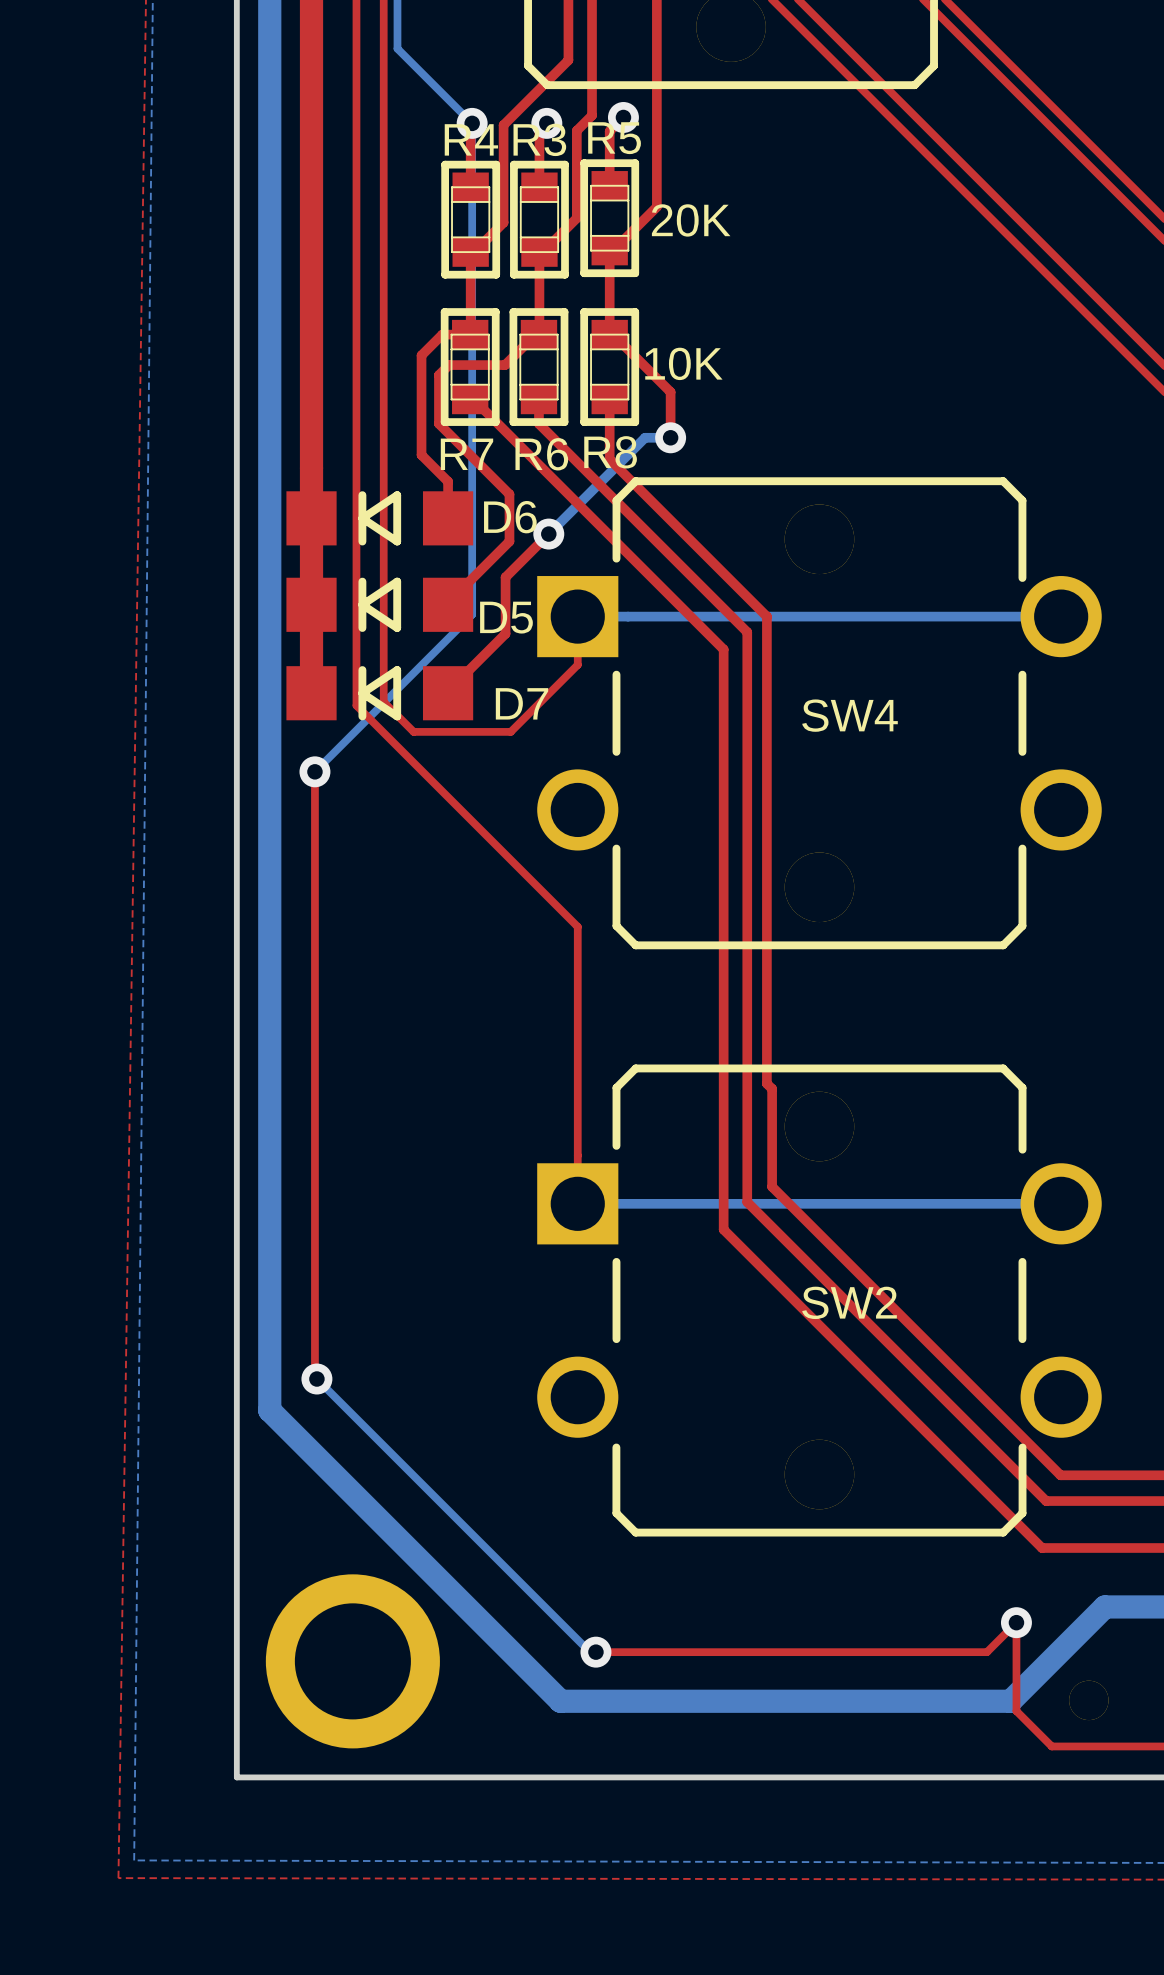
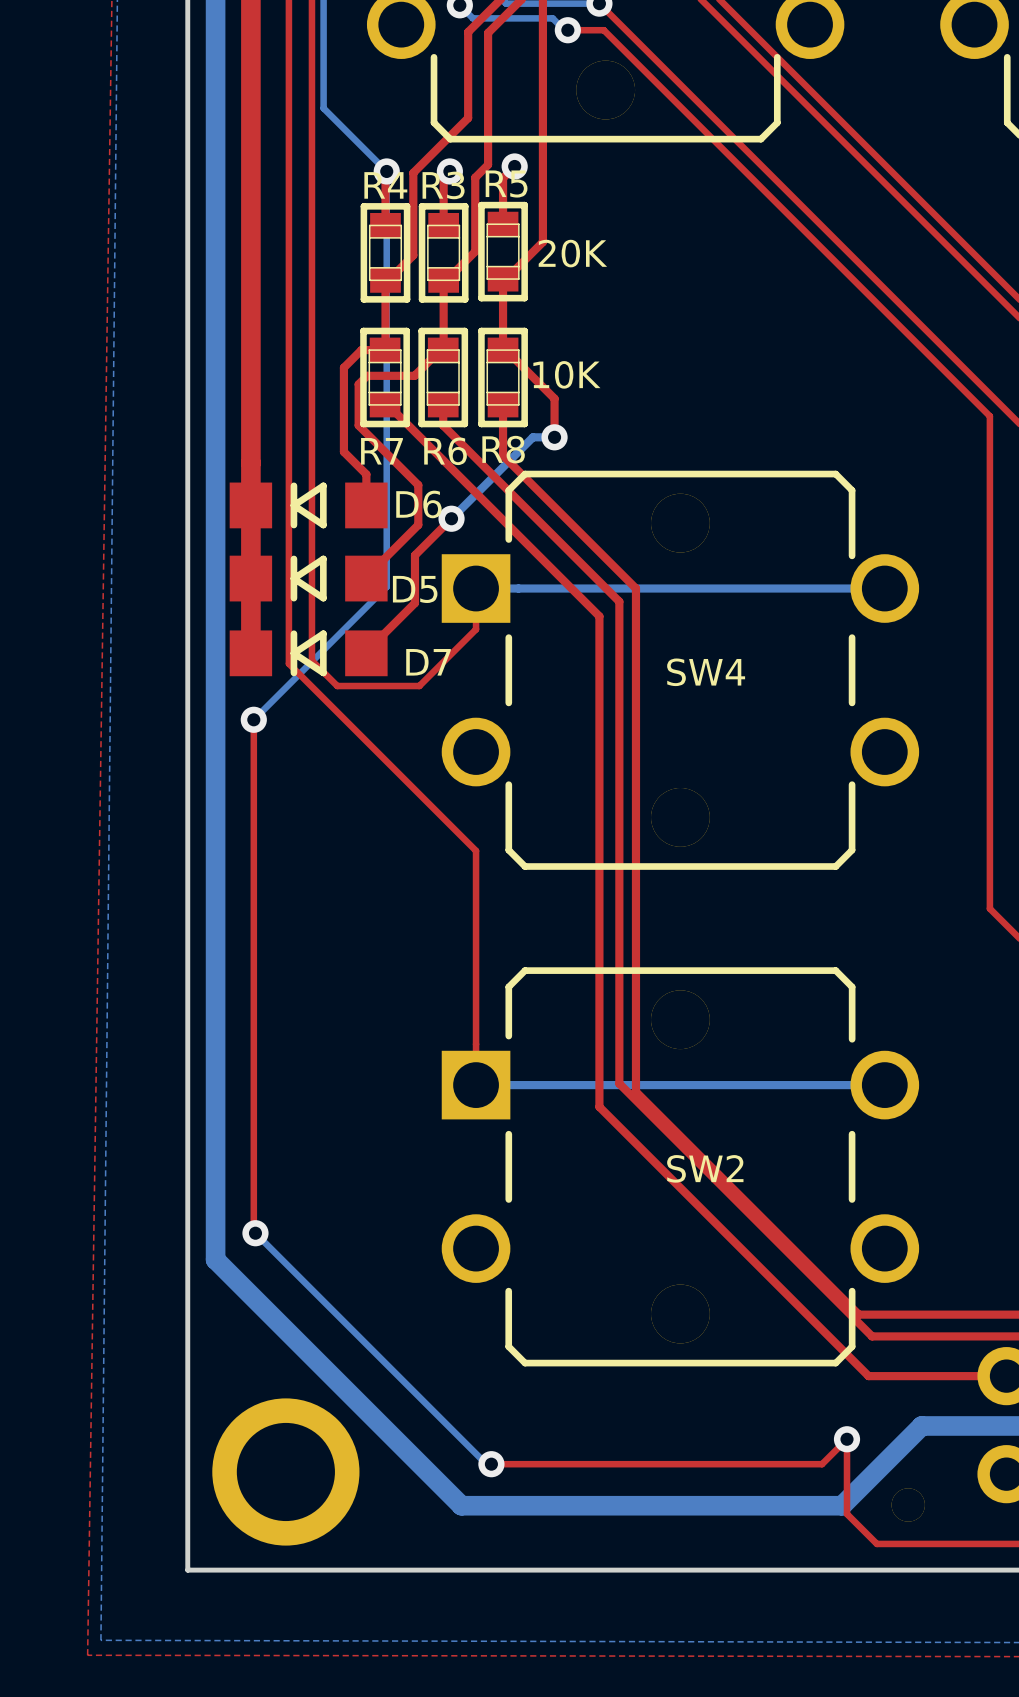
top track: (766, 1083) (772, 1088) (772, 1186) (1060, 1475) -> (635, 983) (635, 1091) (858, 1314) (884, 1314)

